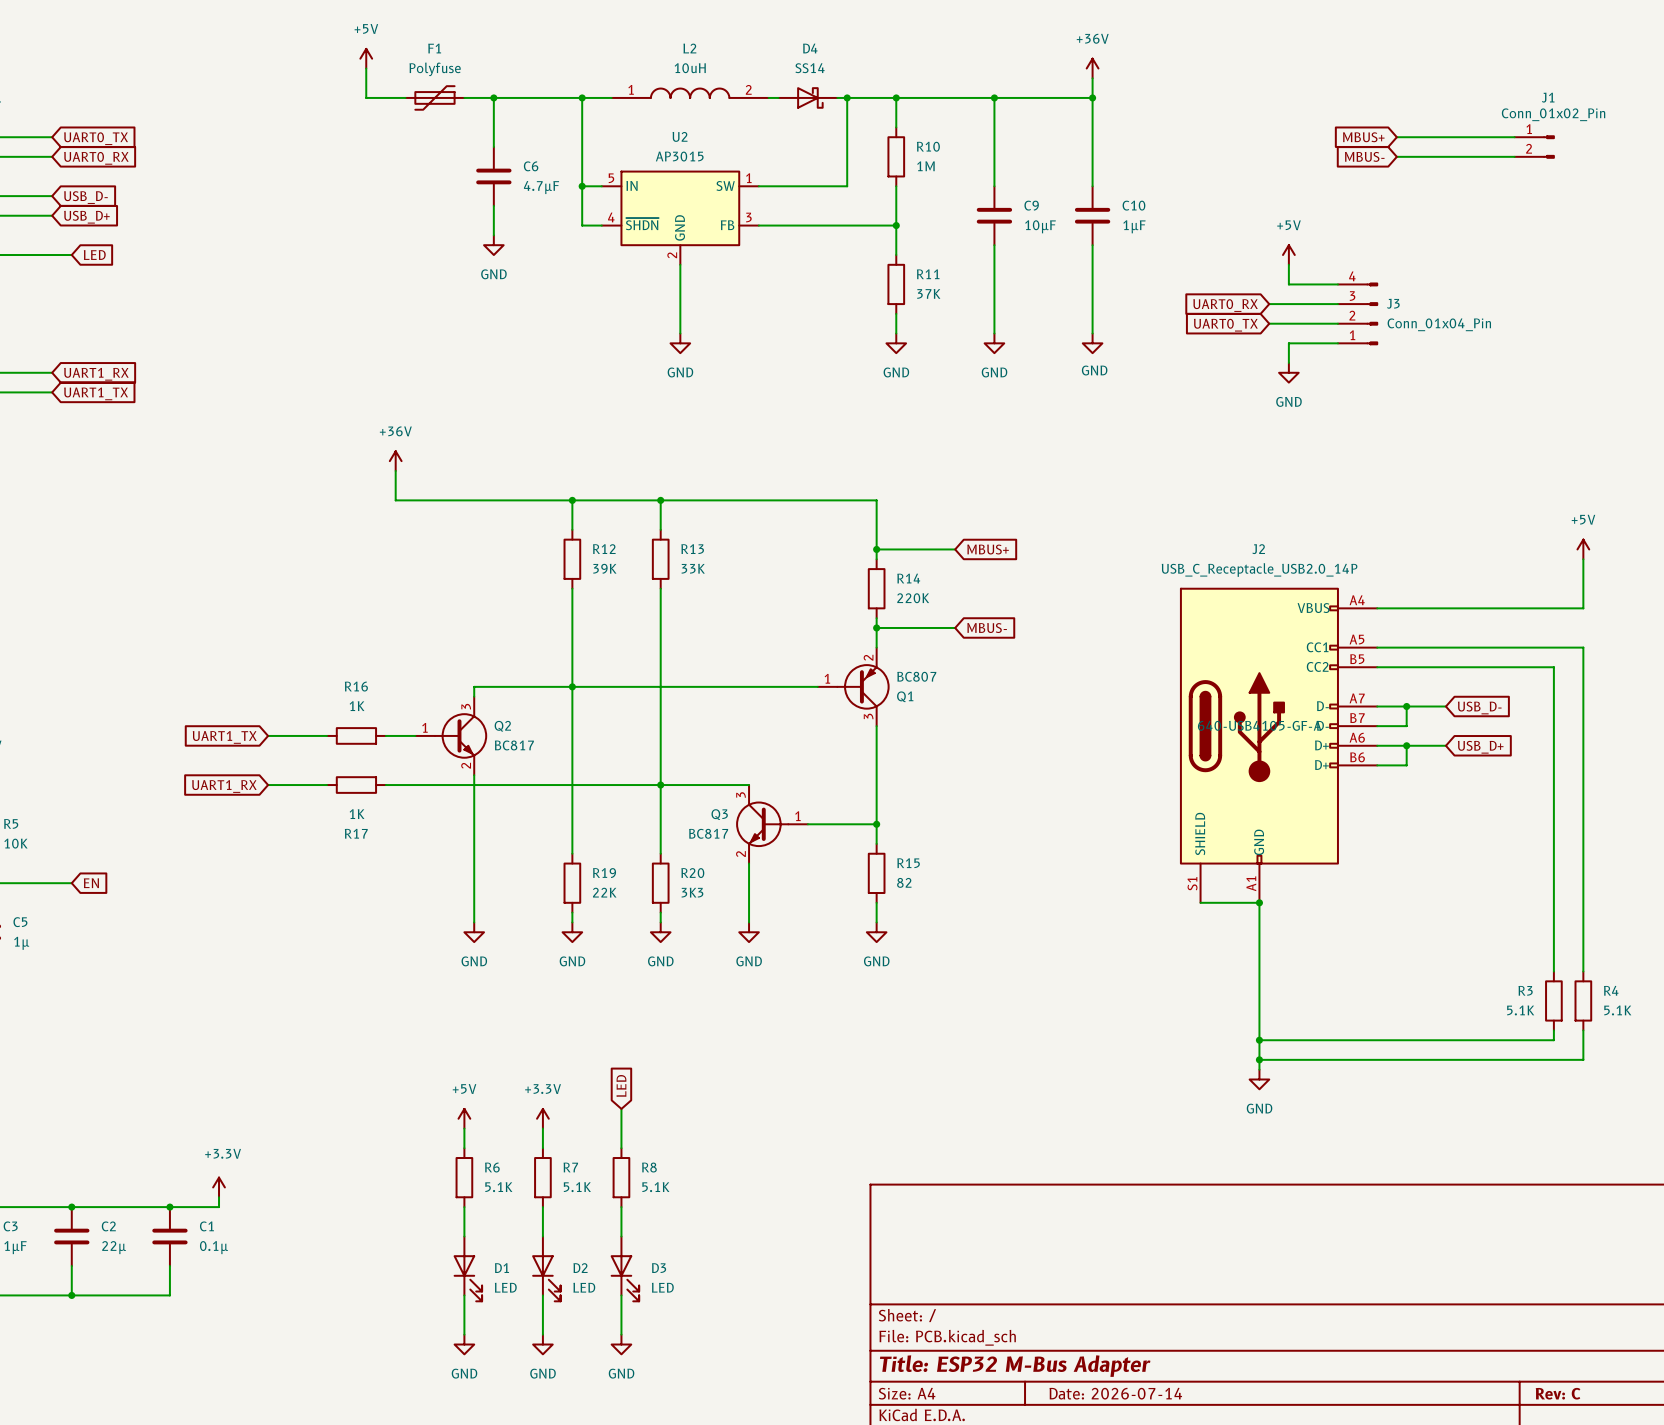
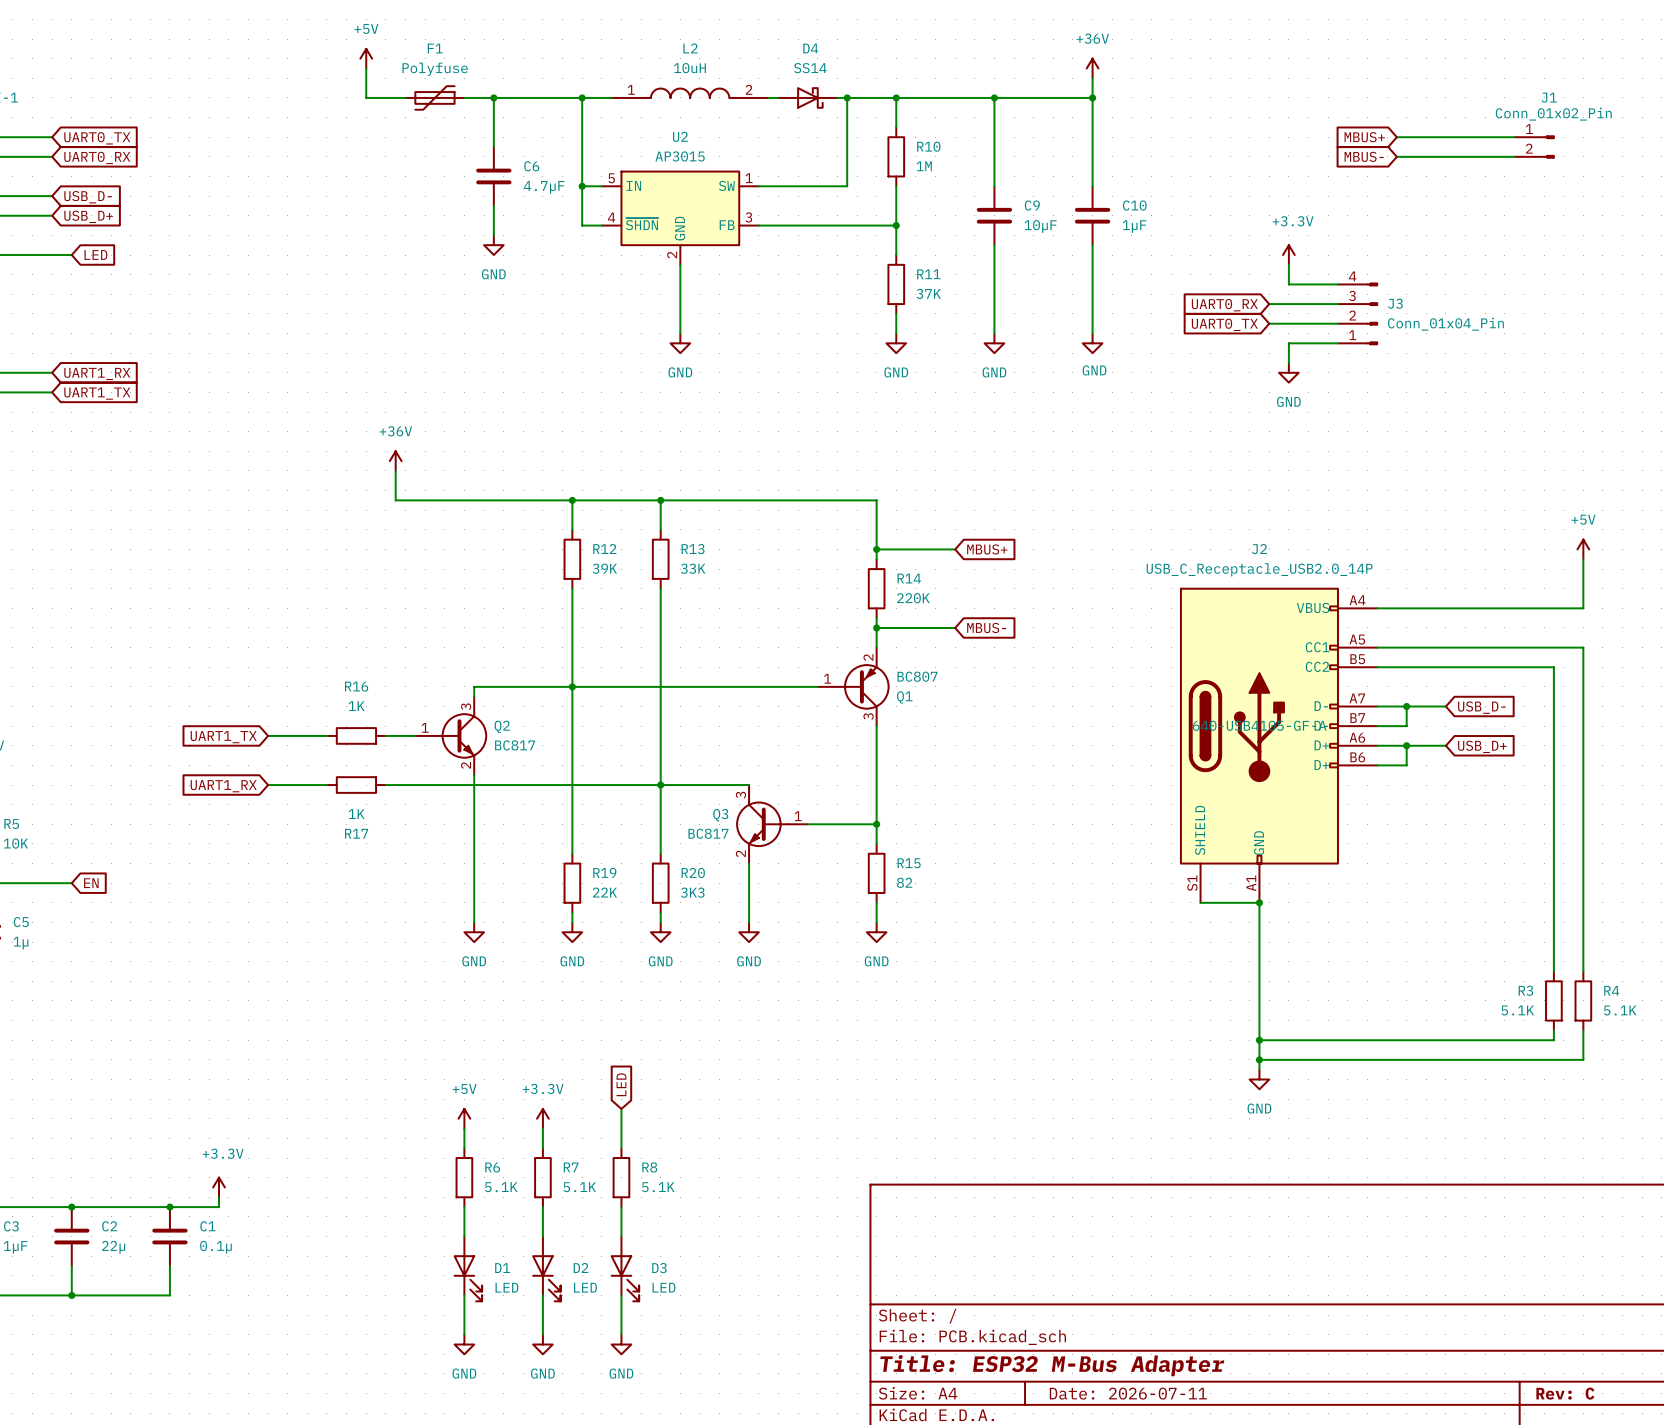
power symbol: +5V (1288, 255) -> +3.3V (1288, 255)
title block: Date: 2026-07-14 (1115, 1393) -> Date: 2026-07-11 (1128, 1393)

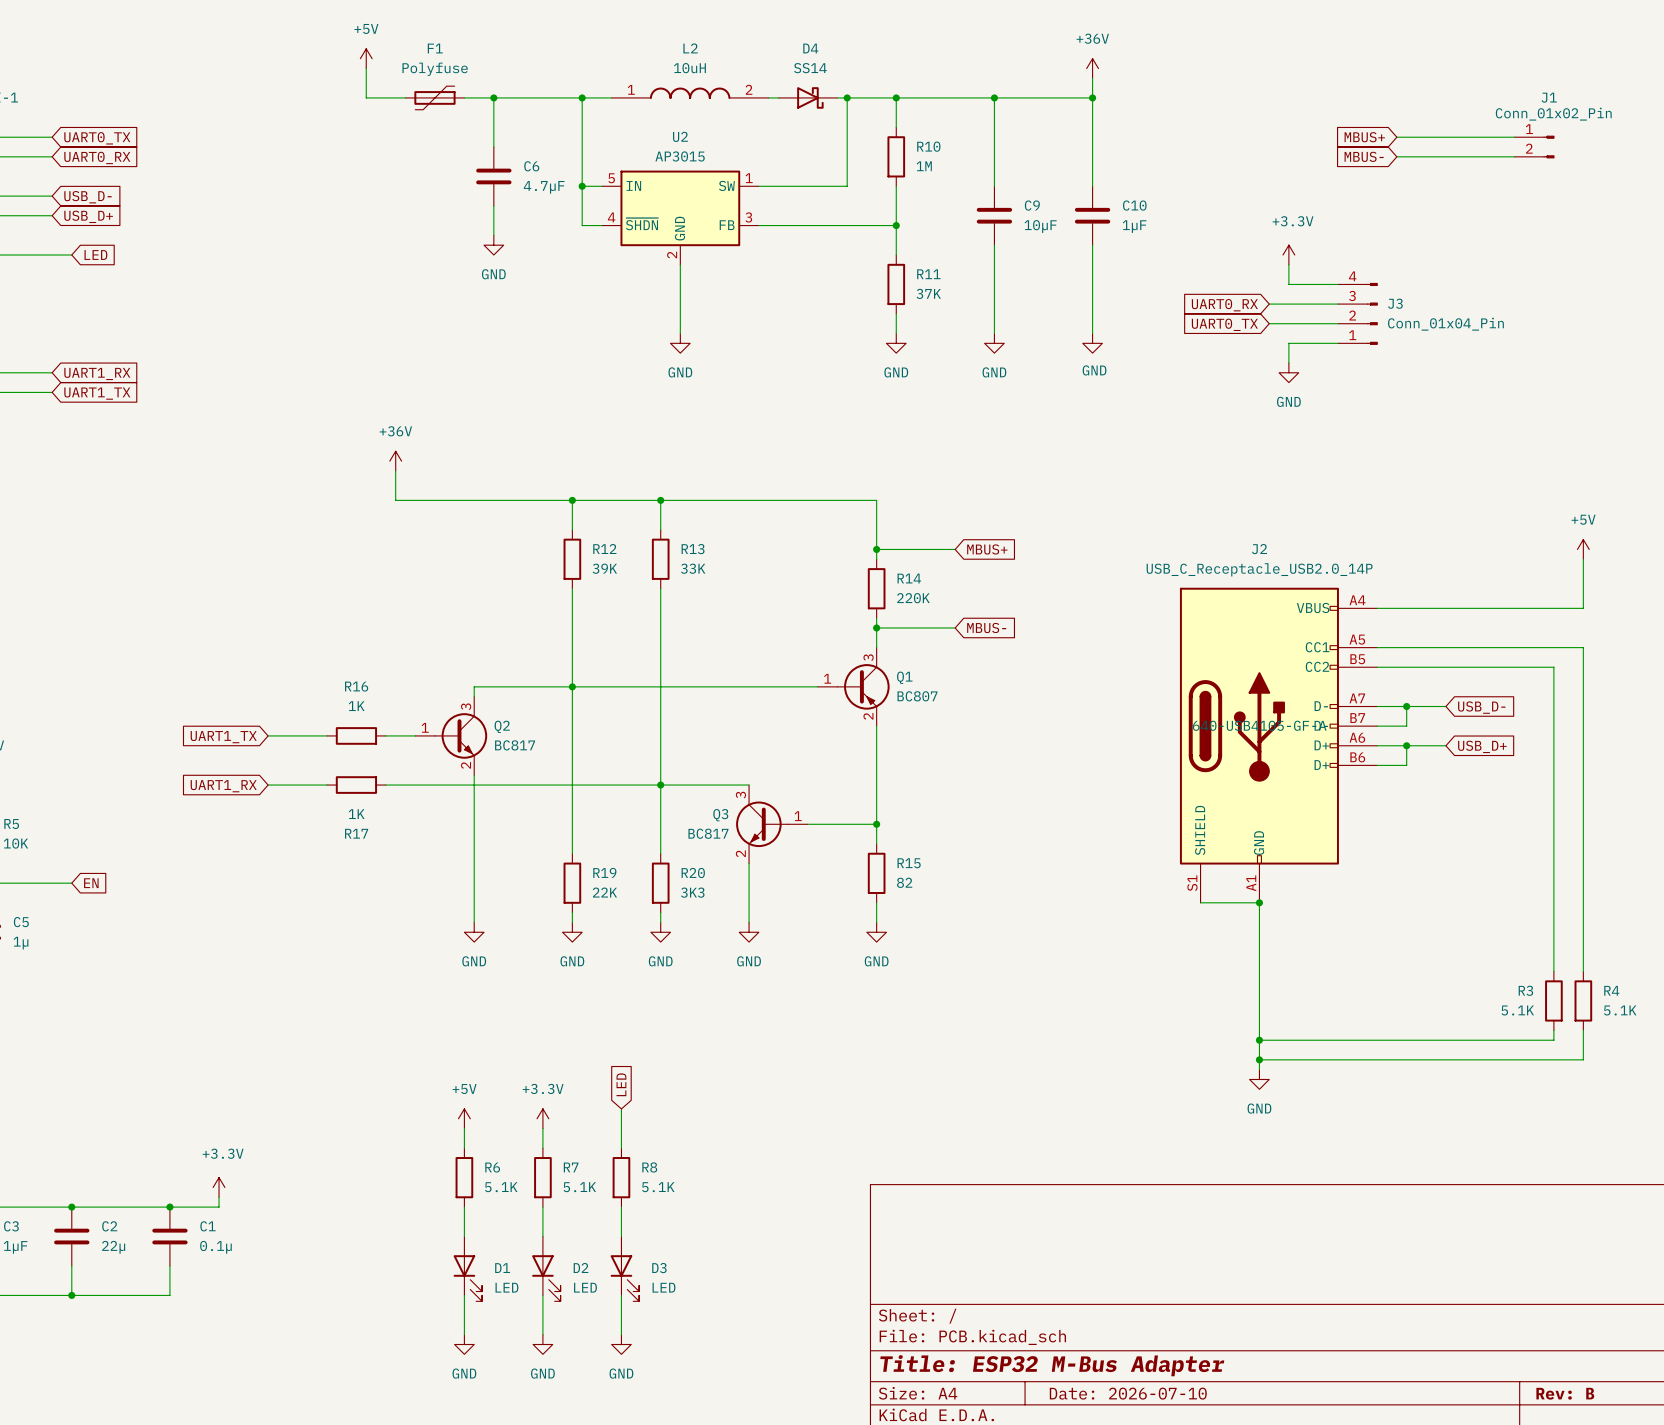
Q1 flip: as is (863, 686) -> up-down (863, 686)
title block: Date: 2026-07-11 (1128, 1393) -> Date: 2026-07-10 (1128, 1393)
title block: Rev: C (1565, 1393) -> Rev: B (1565, 1393)

